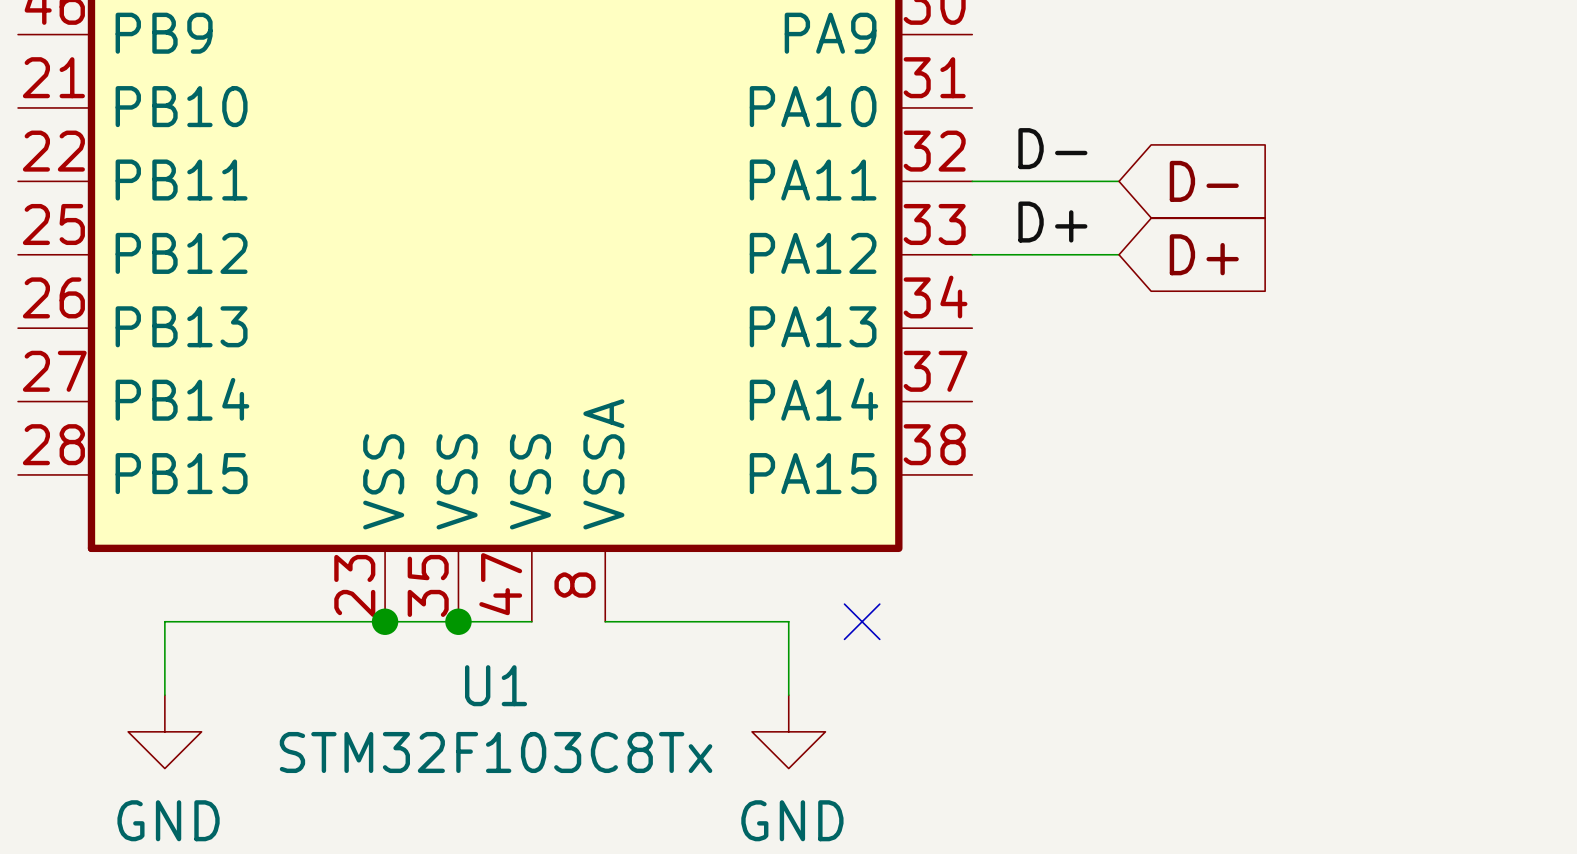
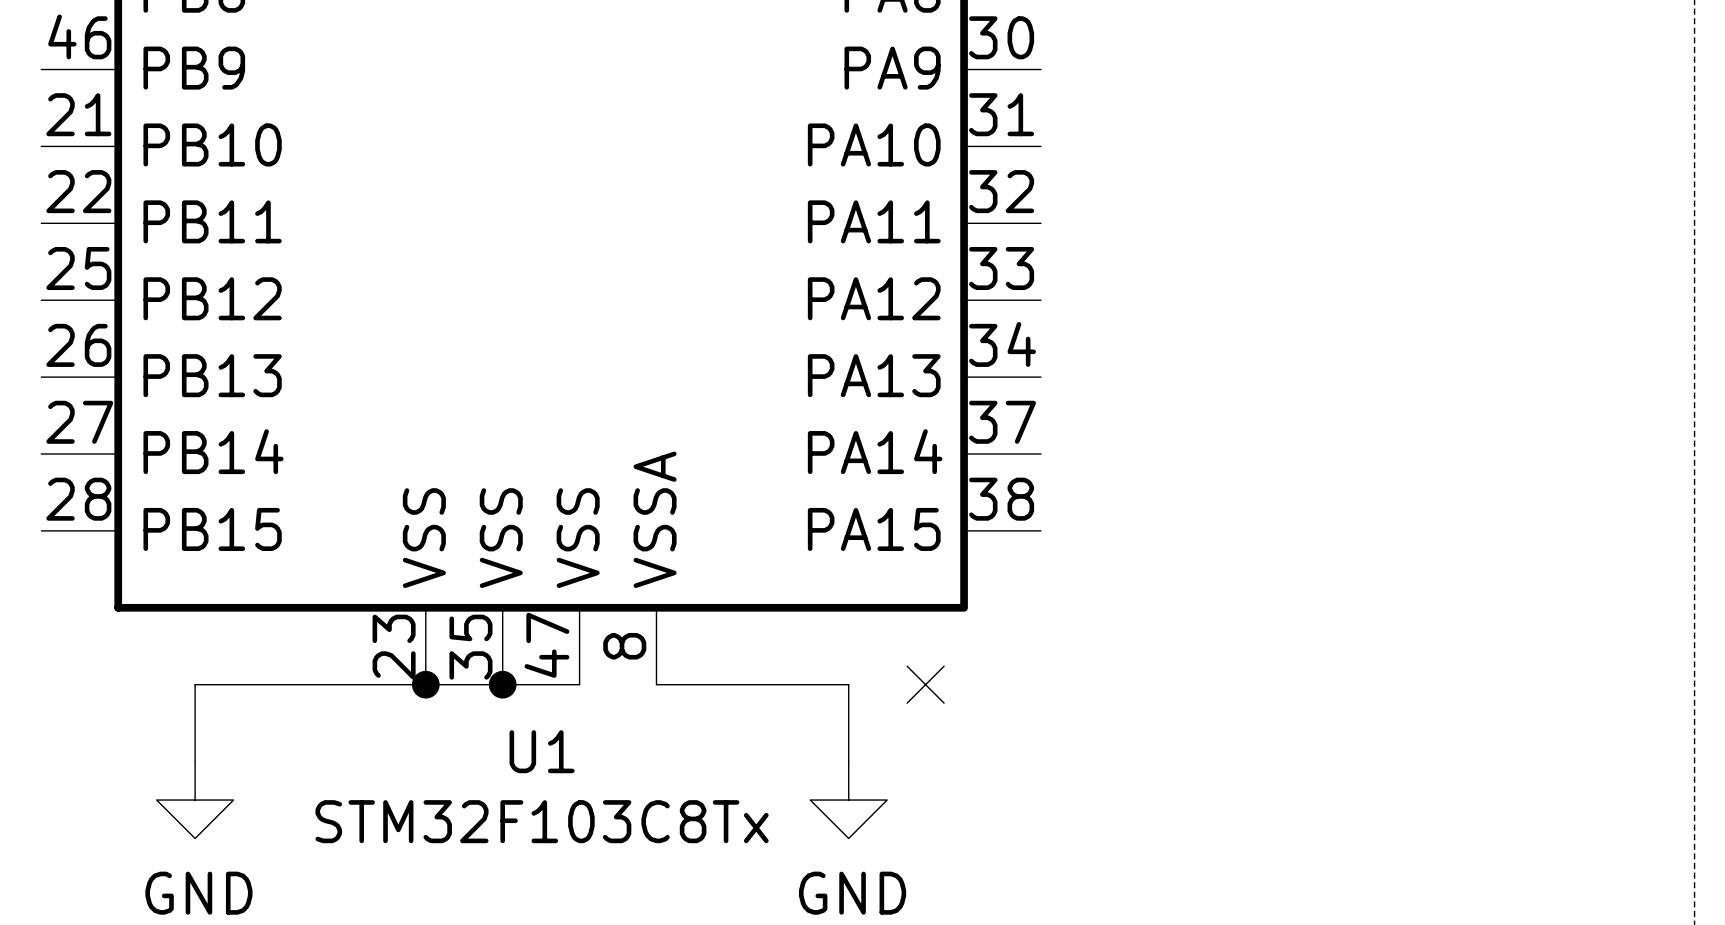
label: D- (1052, 148) -> none
wire: (972, 181) (1119, 181) -> none
global label: D- (1204, 181) -> none
label: D+ (1052, 222) -> none
wire: (972, 254) (1119, 254) -> none
global label: D+ (1204, 254) -> none

